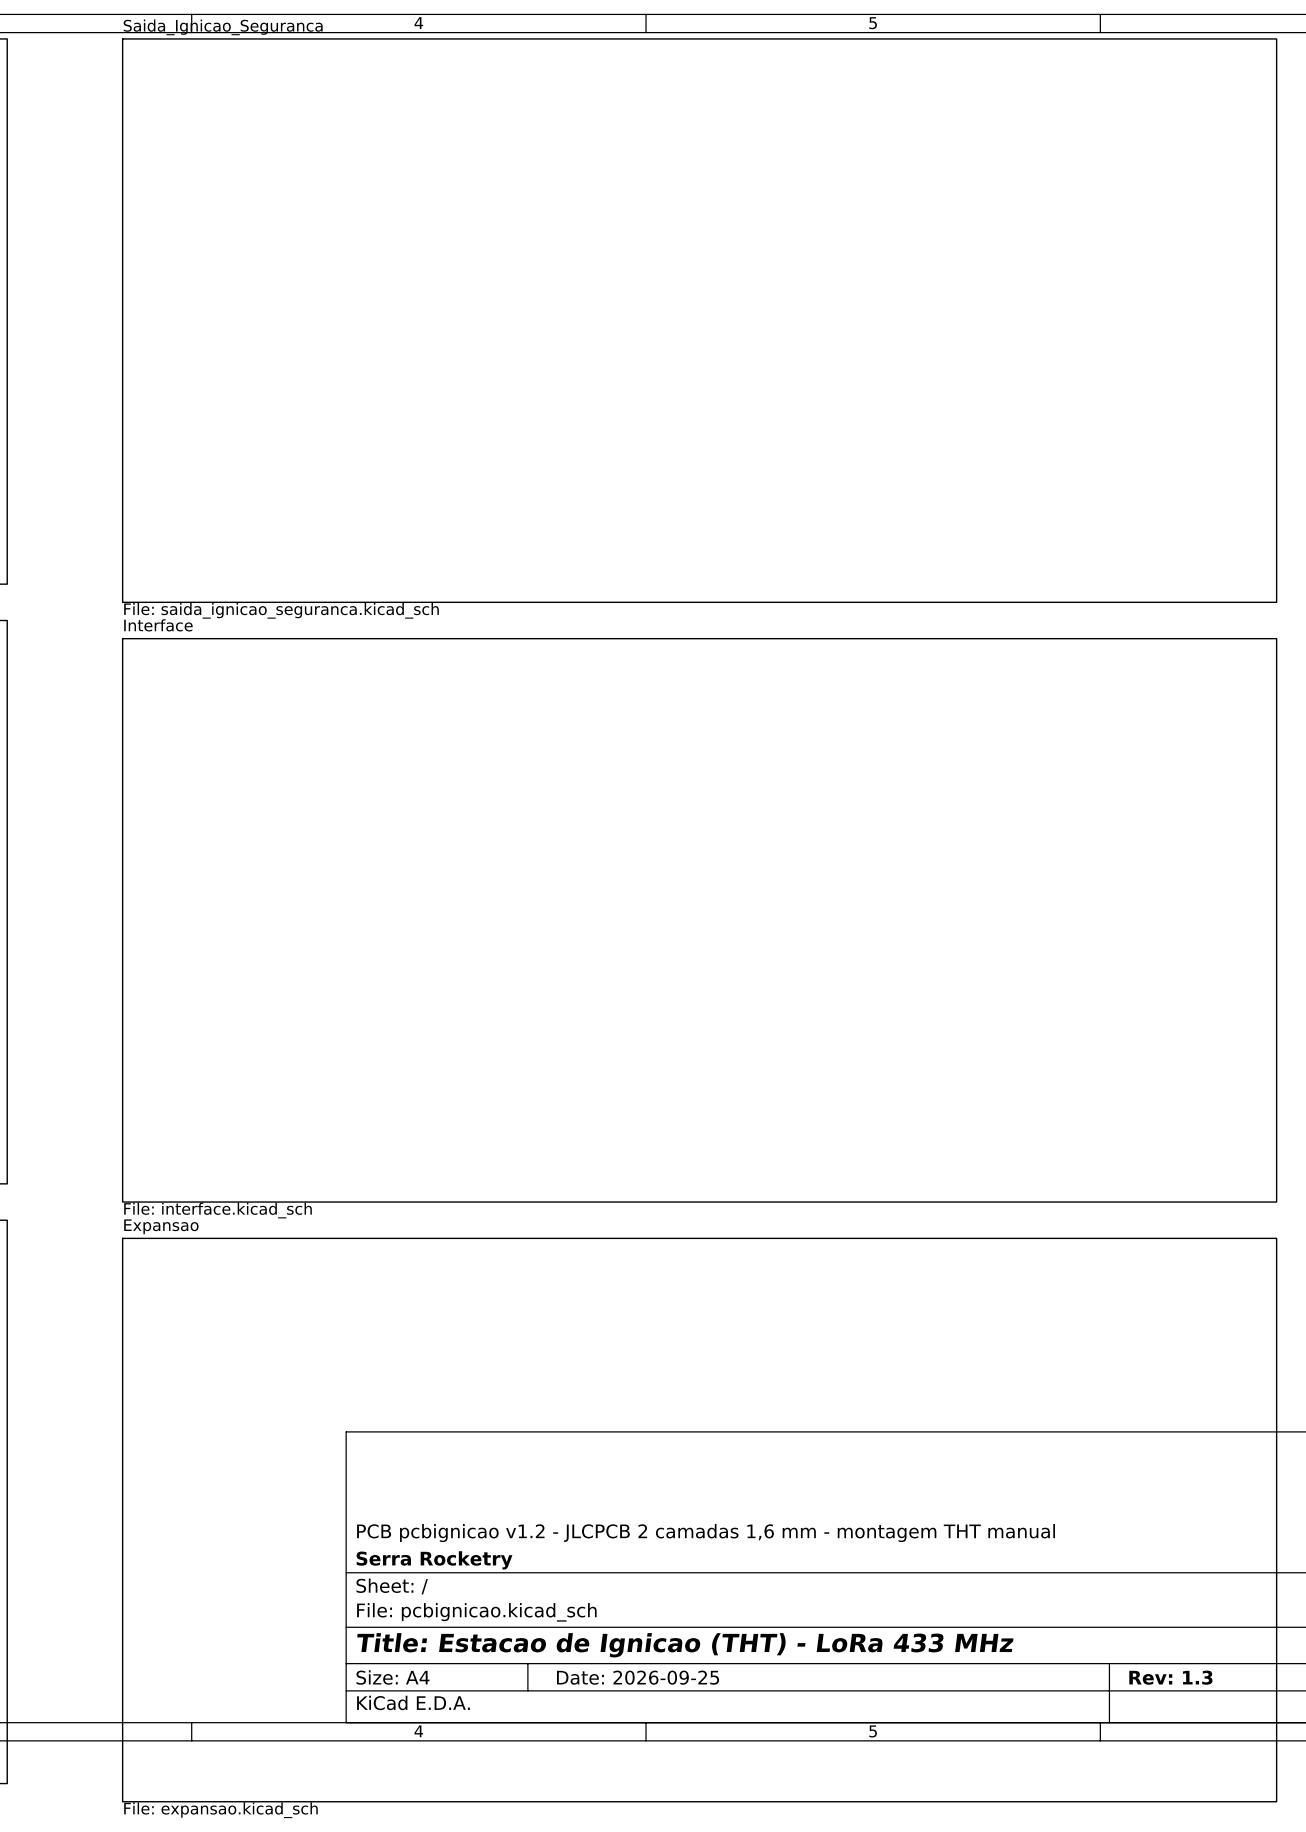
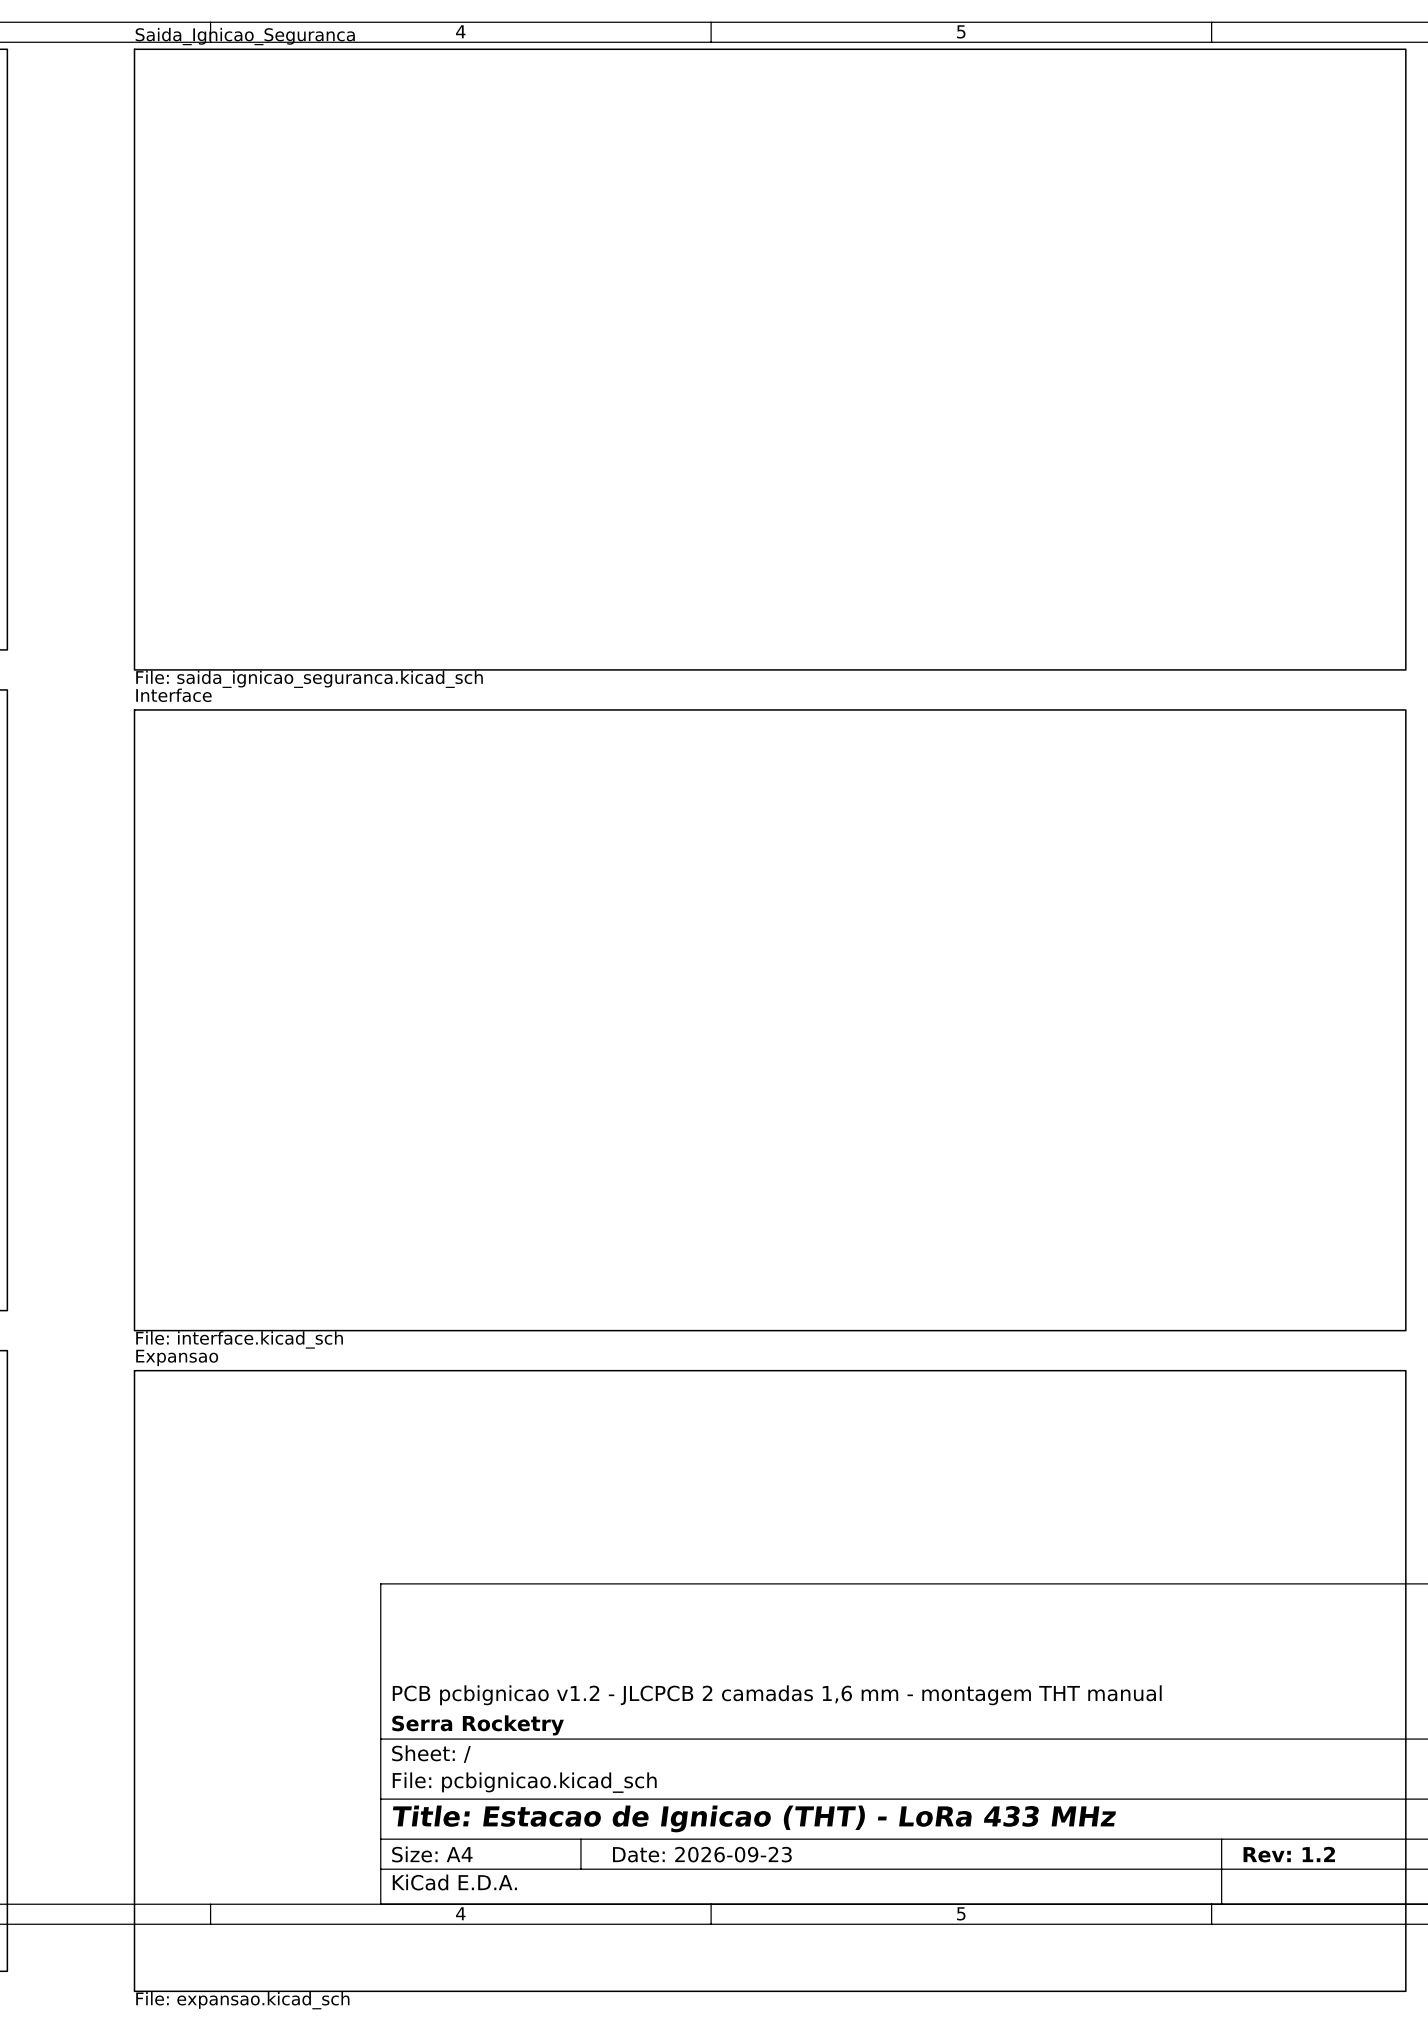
title block: Date: 2026-09-25 (638, 1677) -> Date: 2026-09-23 (702, 1854)
title block: Rev: 1.3 (1170, 1677) -> Rev: 1.2 (1289, 1854)

